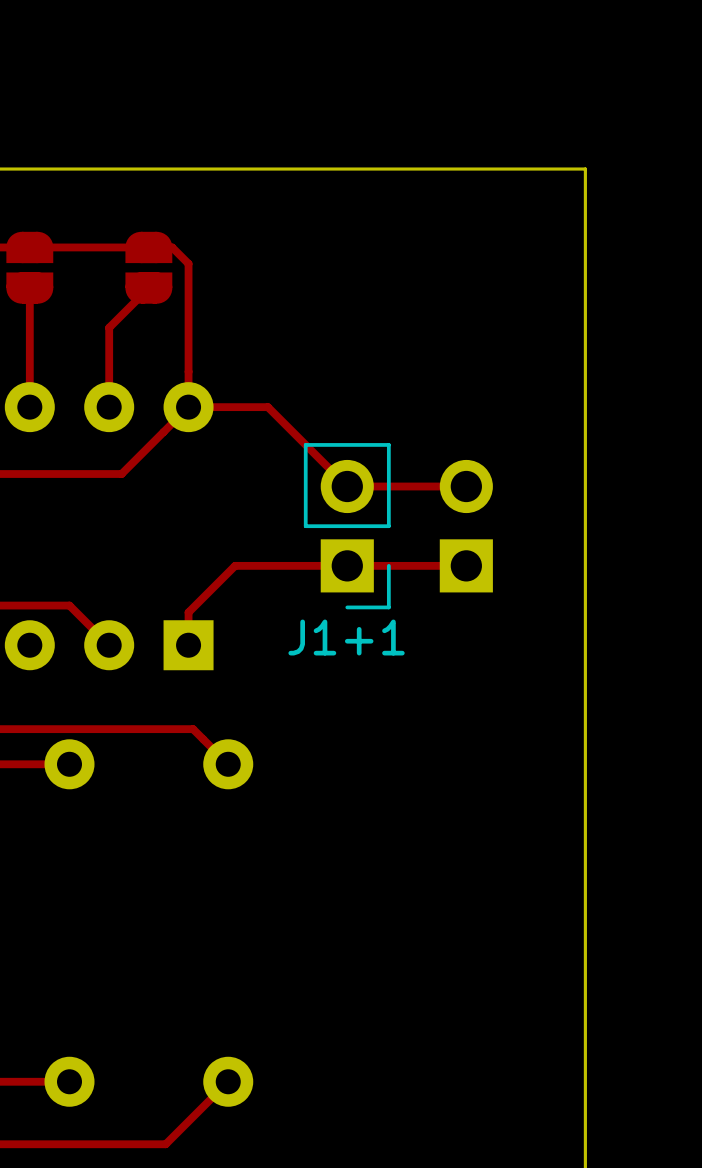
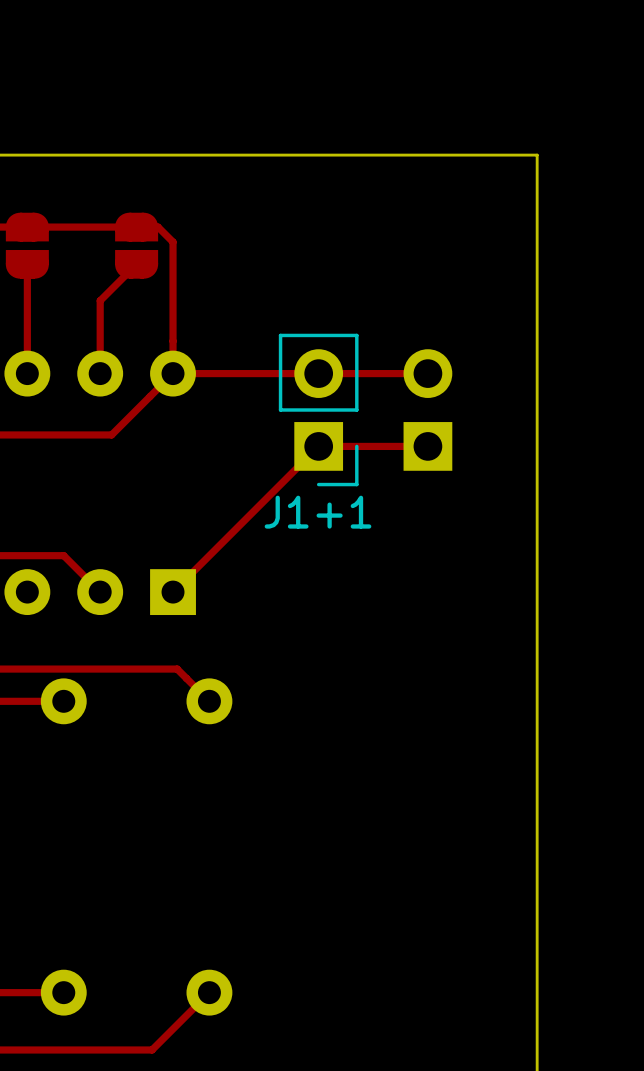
top track: (267, 407) (347, 486) -> (245, 373) (427, 373)
J1+1 position: (347, 526) -> (318, 410)
part position: (466, 526) -> (427, 410)
top track: (466, 565) (235, 565) (188, 612) (188, 645) -> (318, 446) (173, 592)

